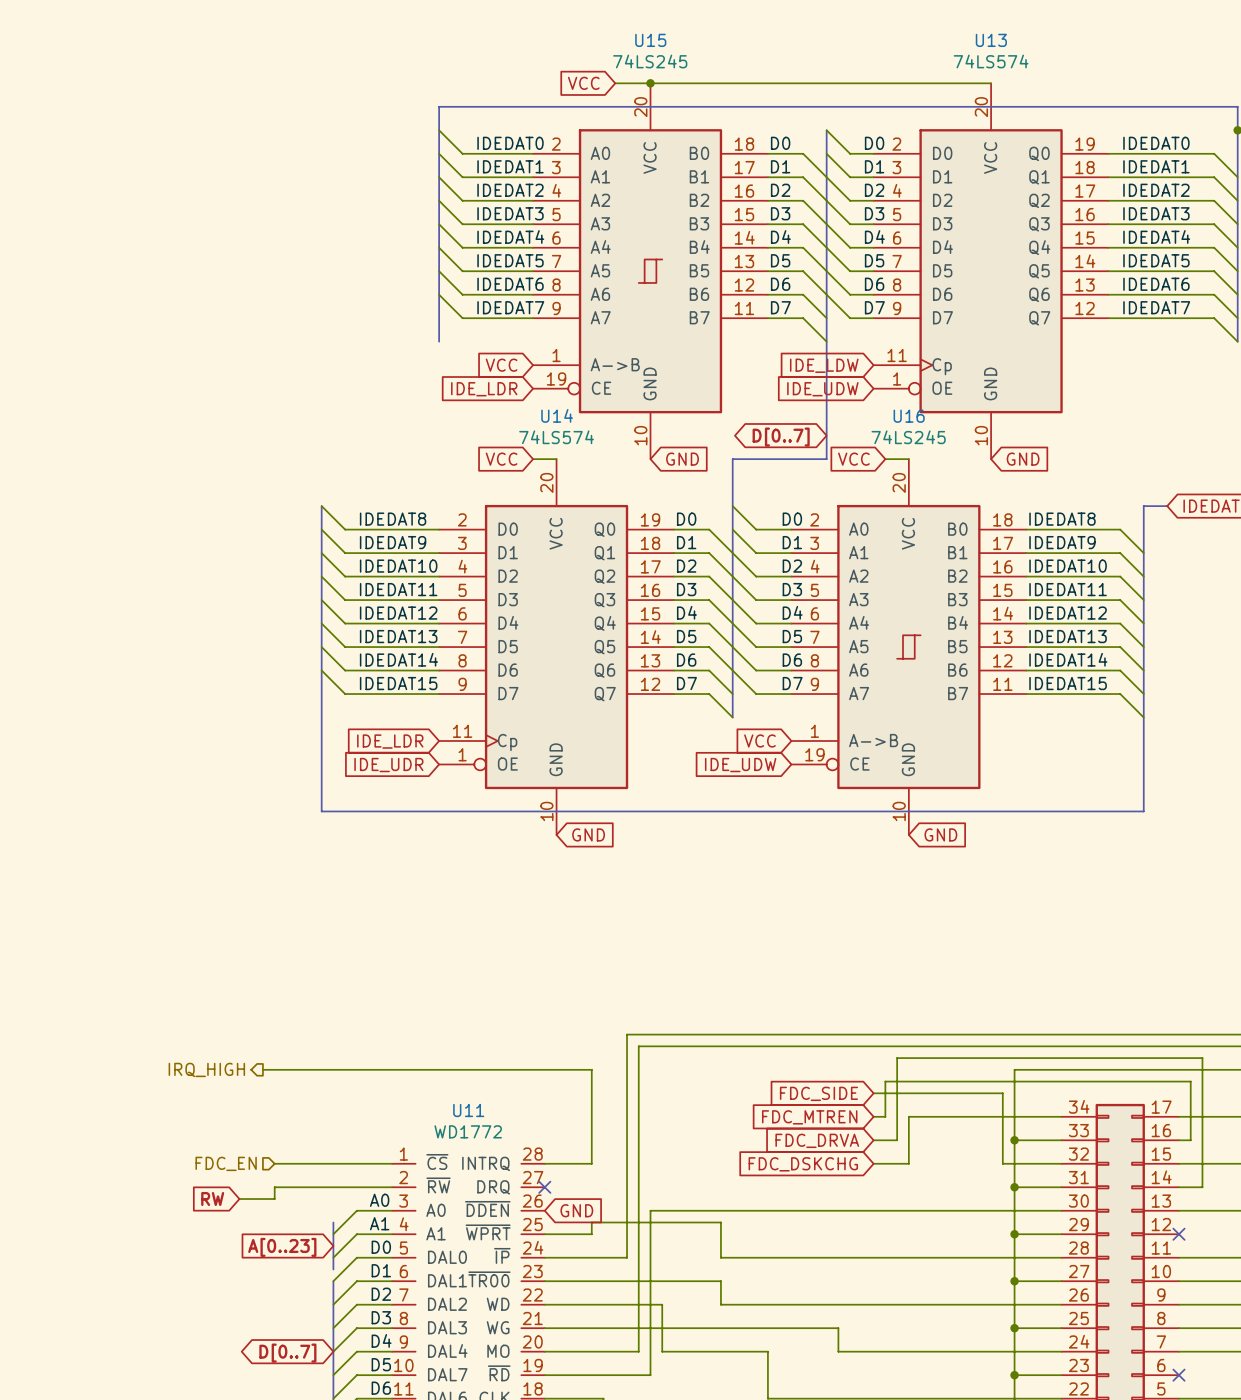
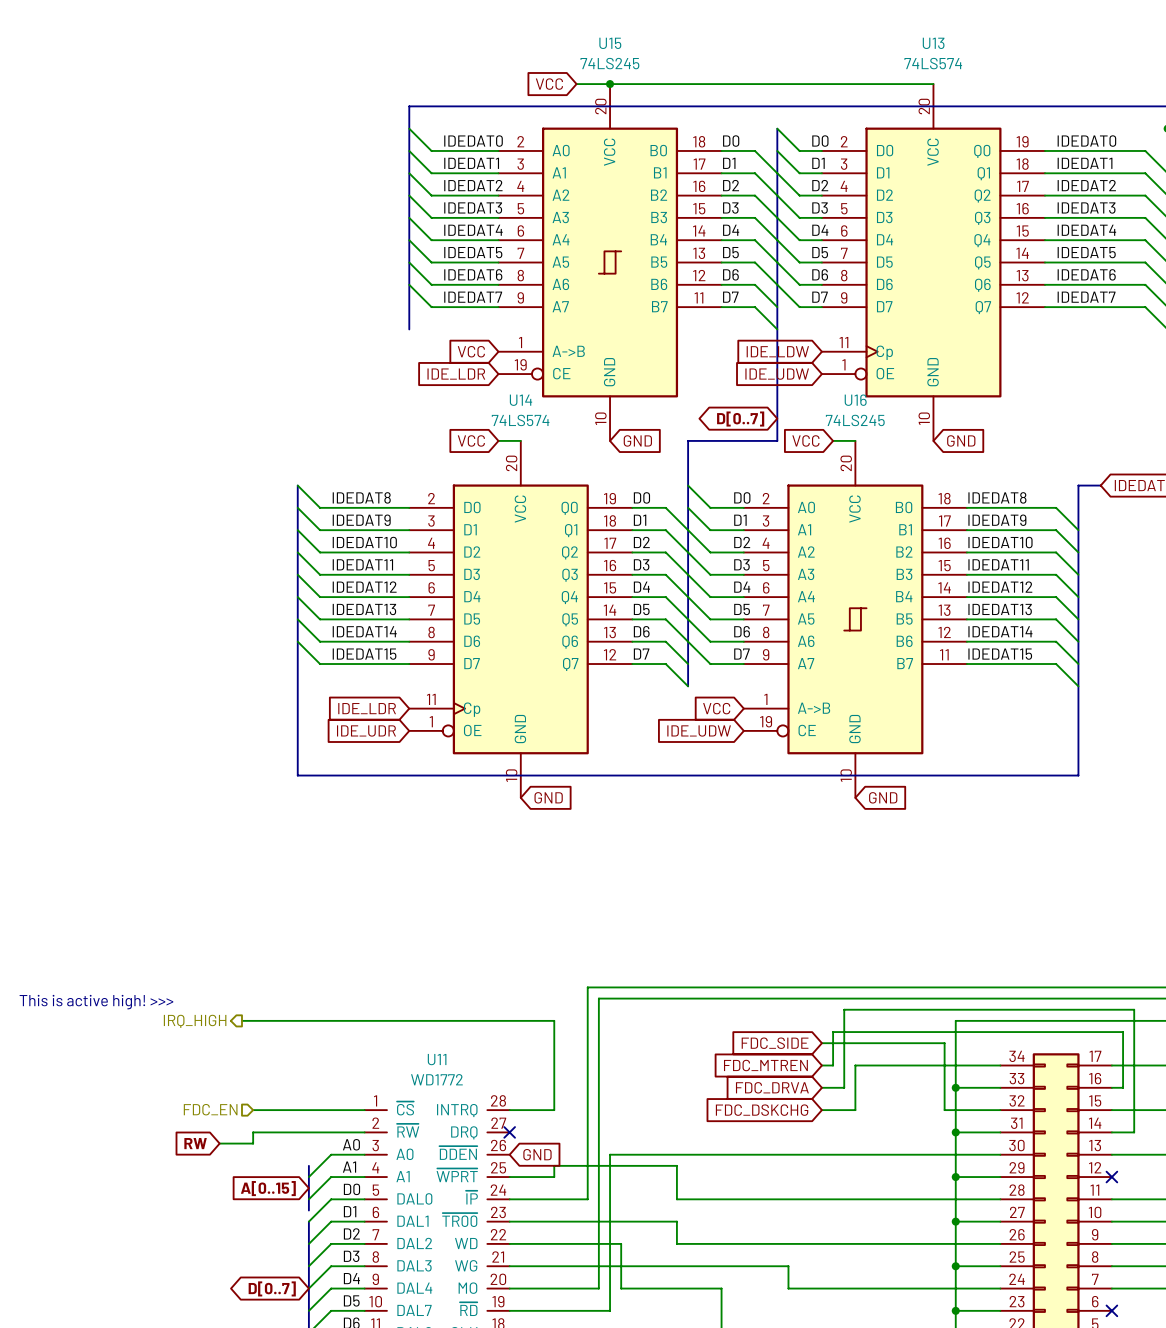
text: none -> This is active high! >>> (96, 1002)
global label: A[0..23] (282, 1247) -> A[0..15] (268, 1188)

